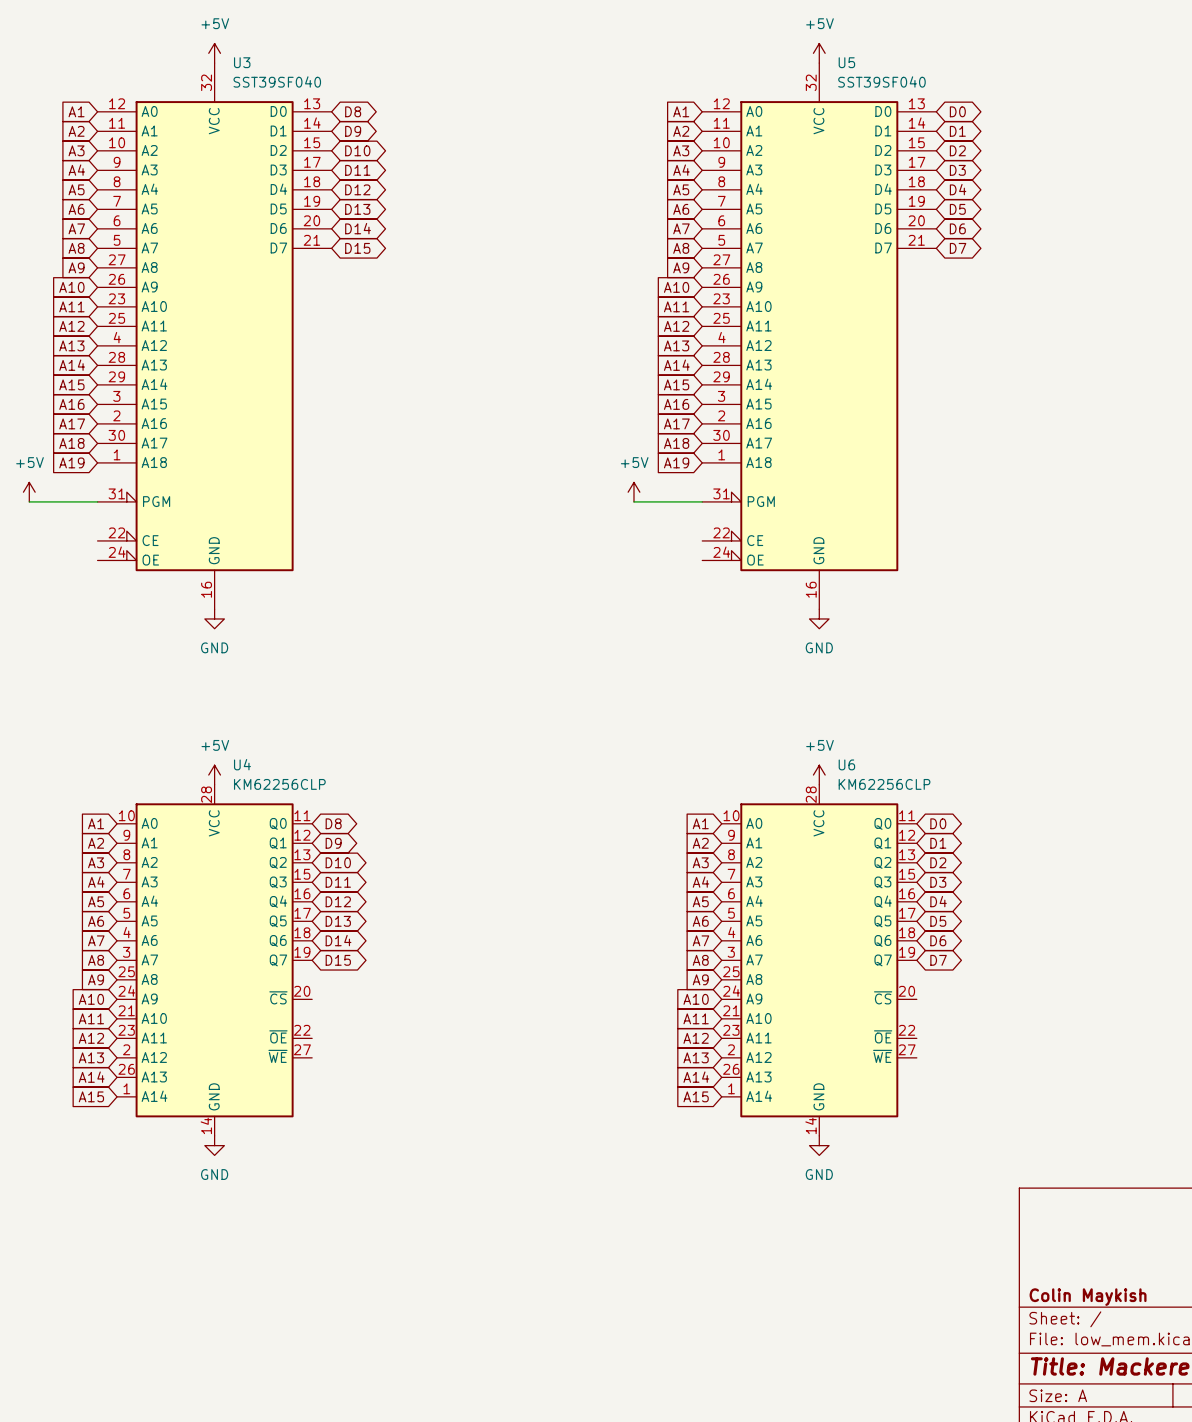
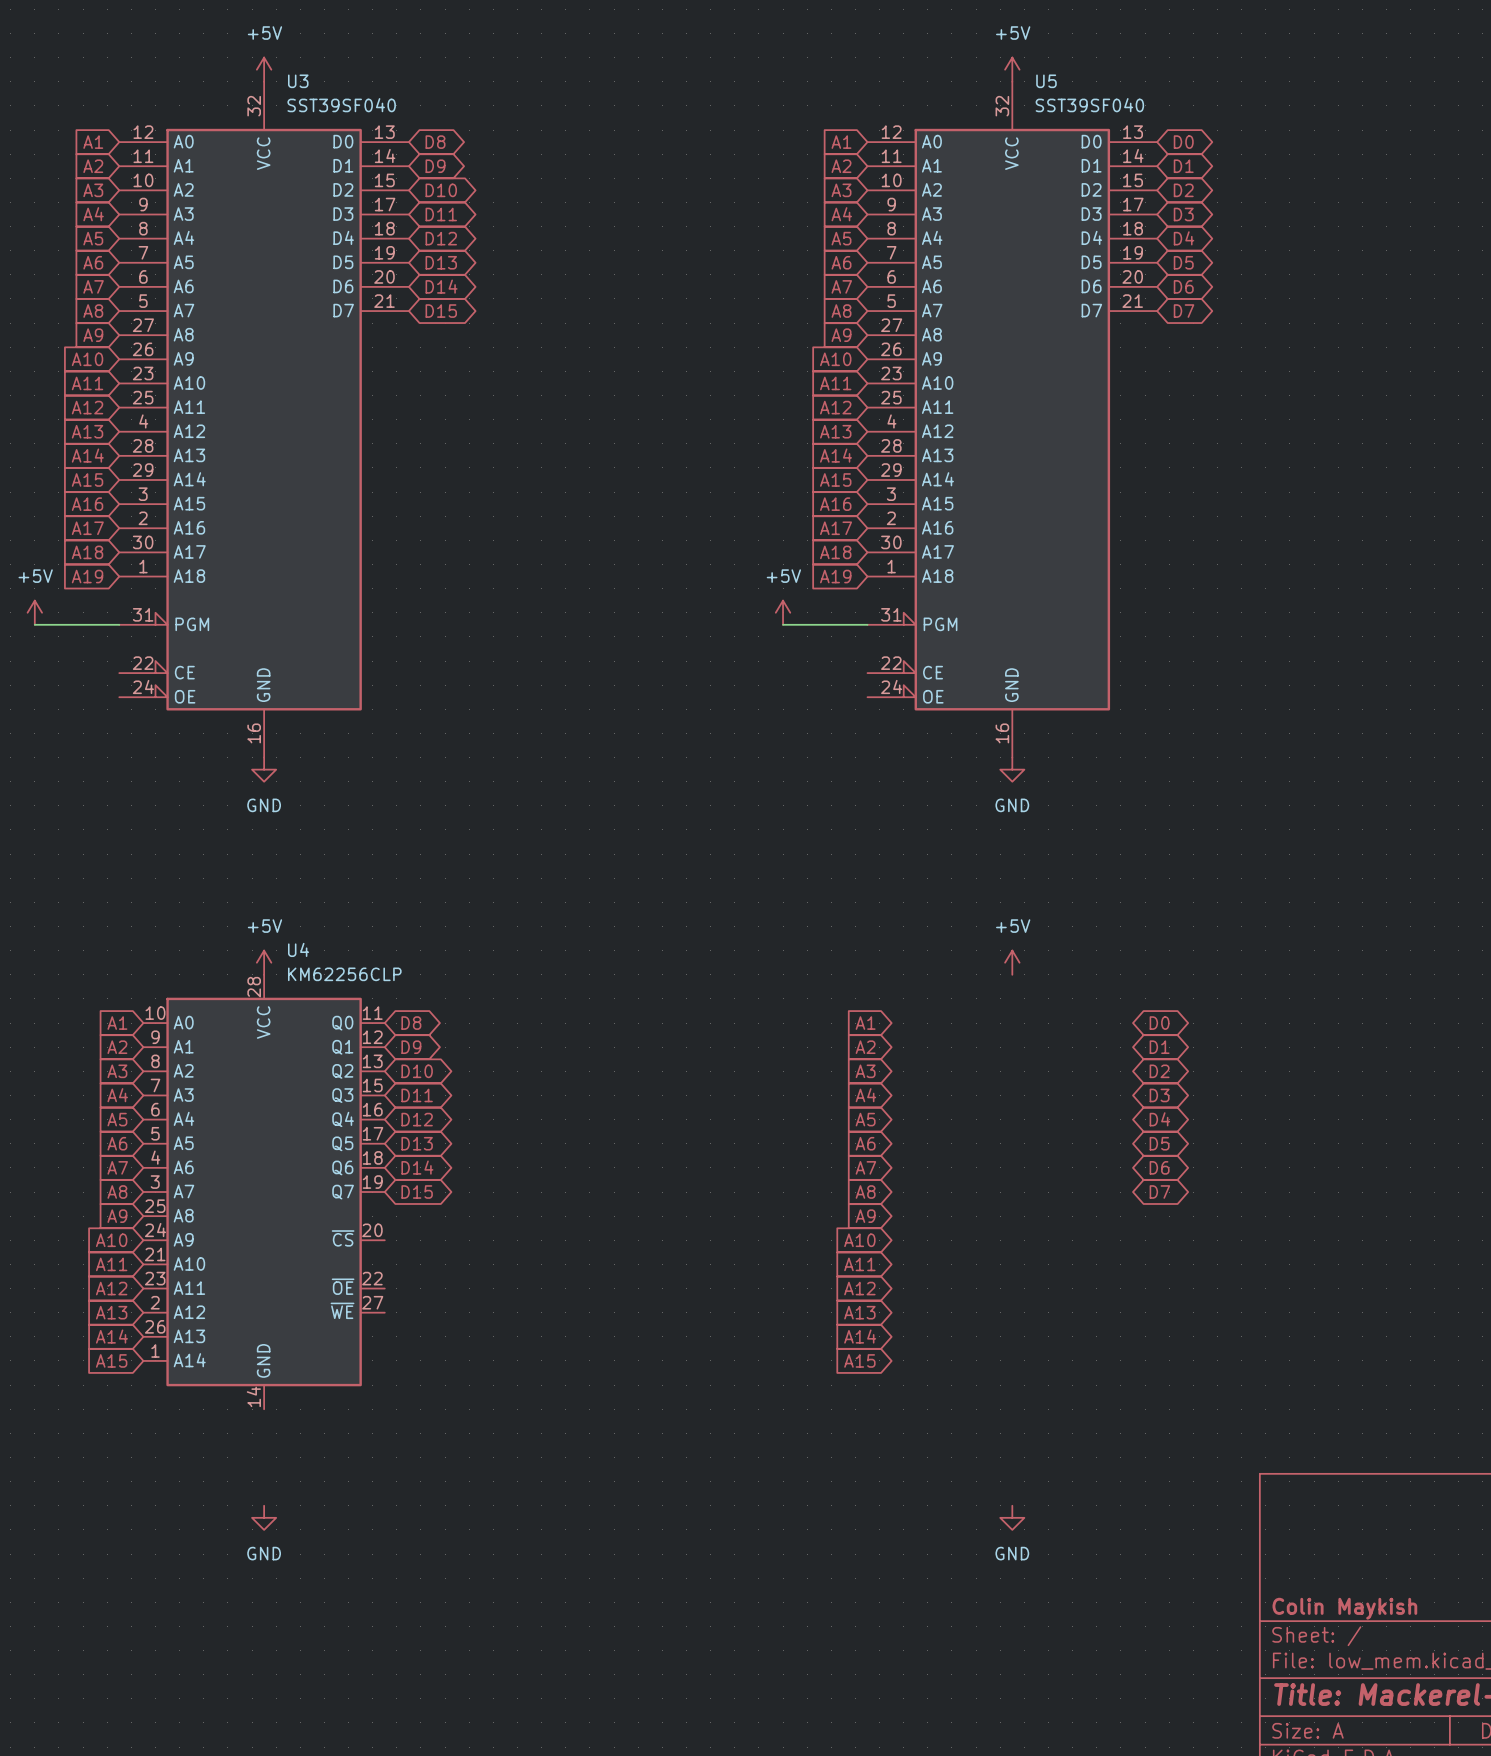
U6: KM62256CLP (819, 960) -> none
power symbol position: GND (214, 1145) -> GND (264, 1517)
power symbol position: GND (819, 1145) -> GND (1012, 1517)

